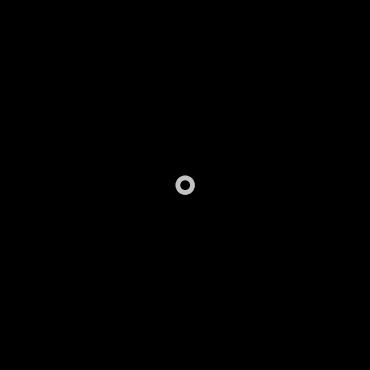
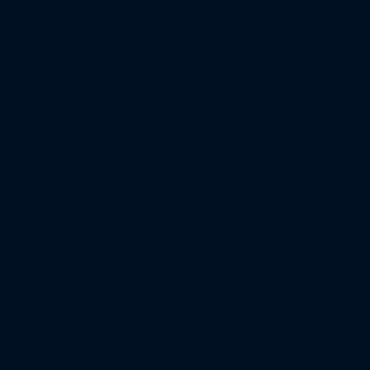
via: (185, 185) -> none

